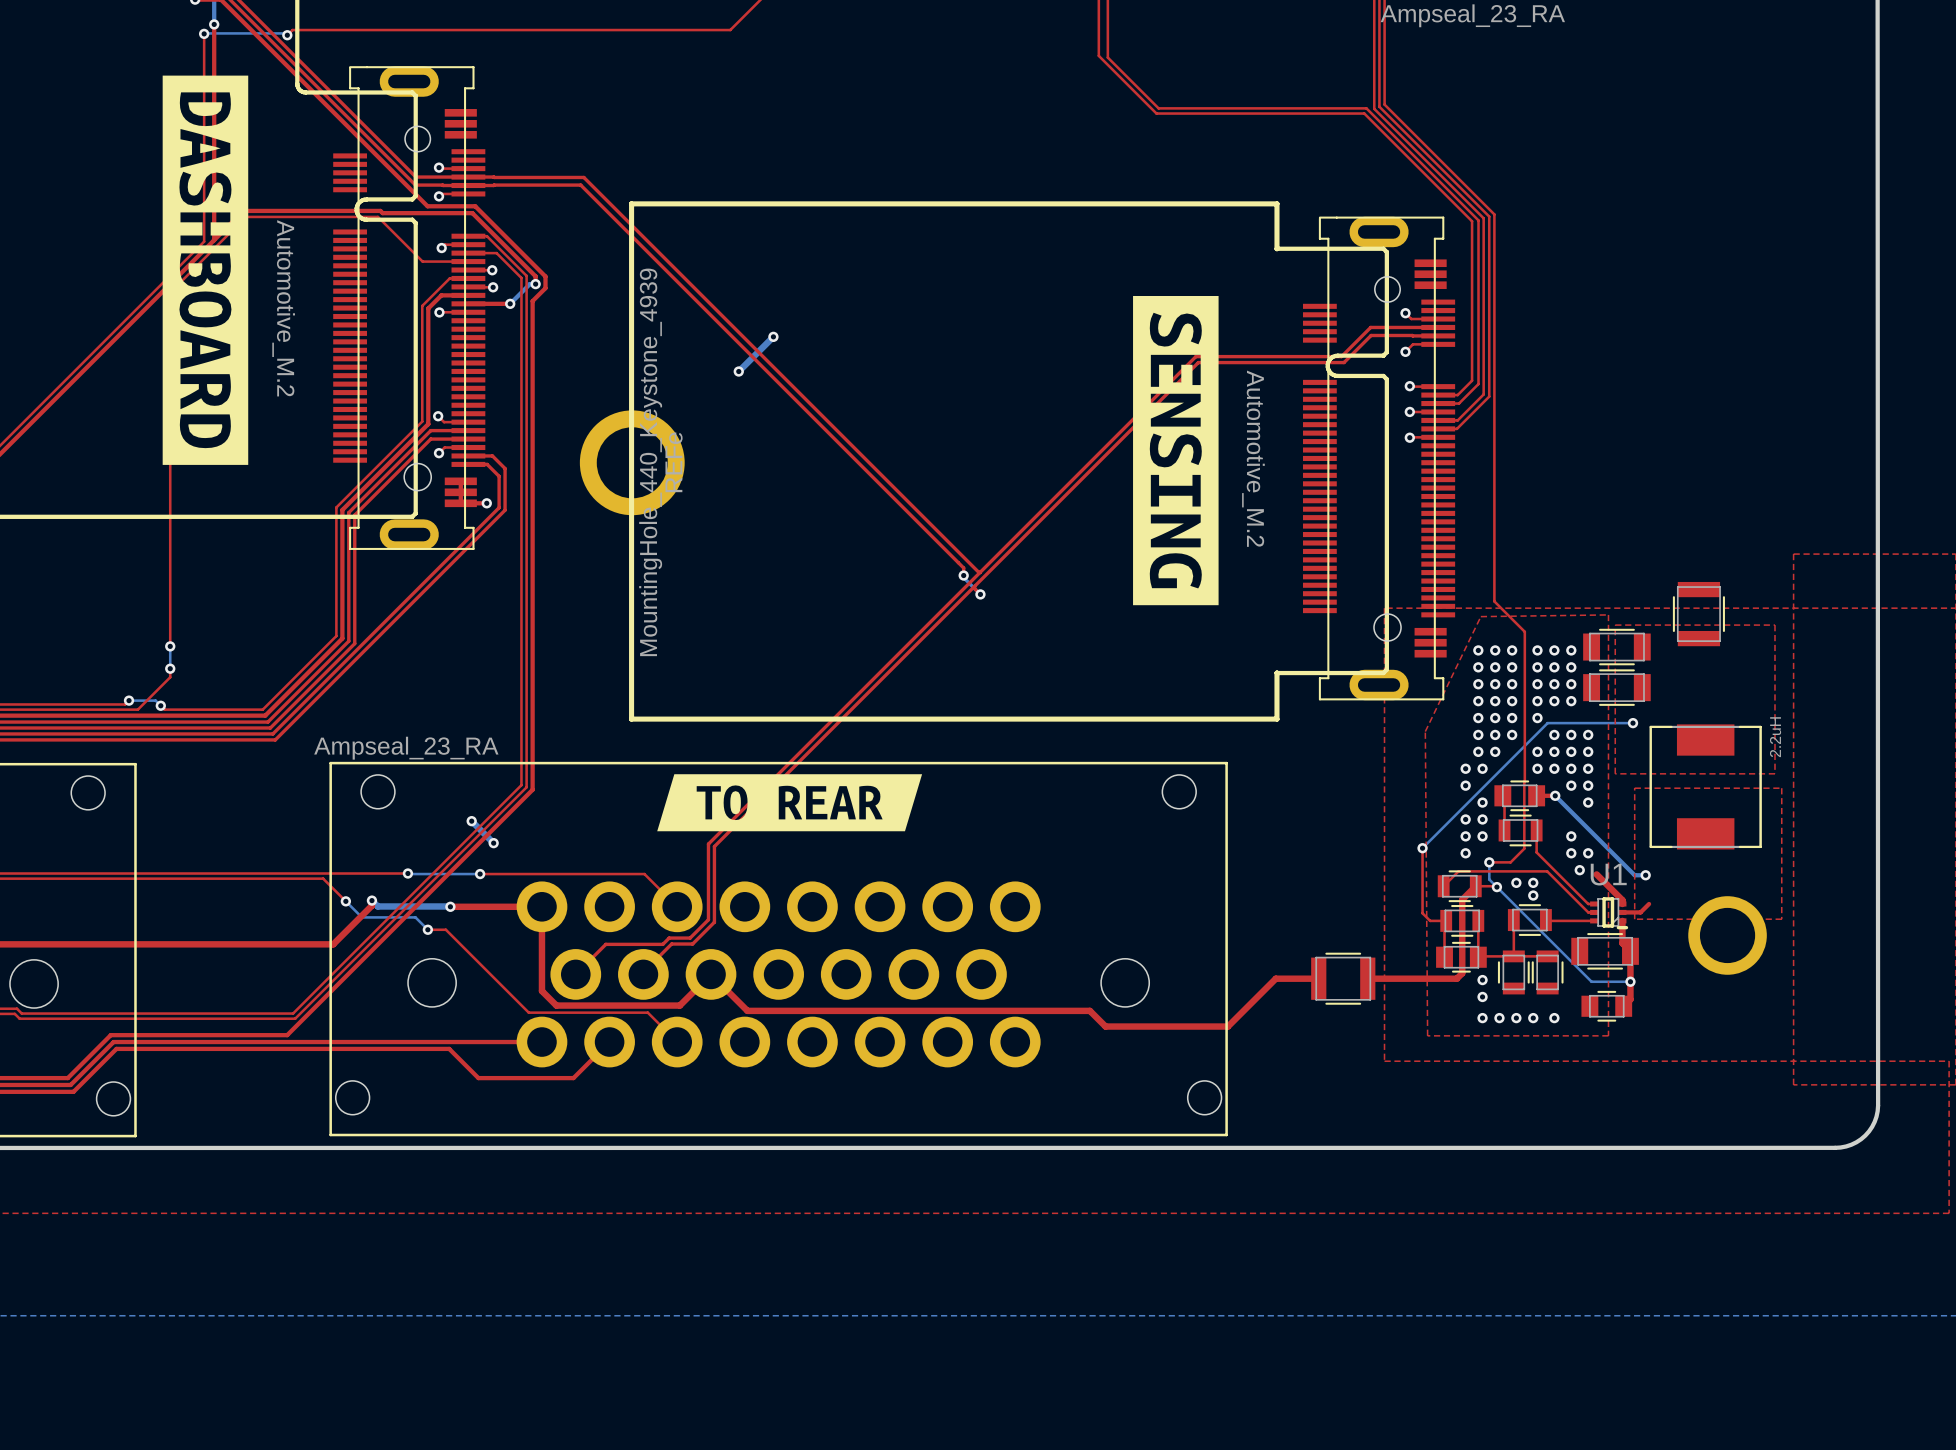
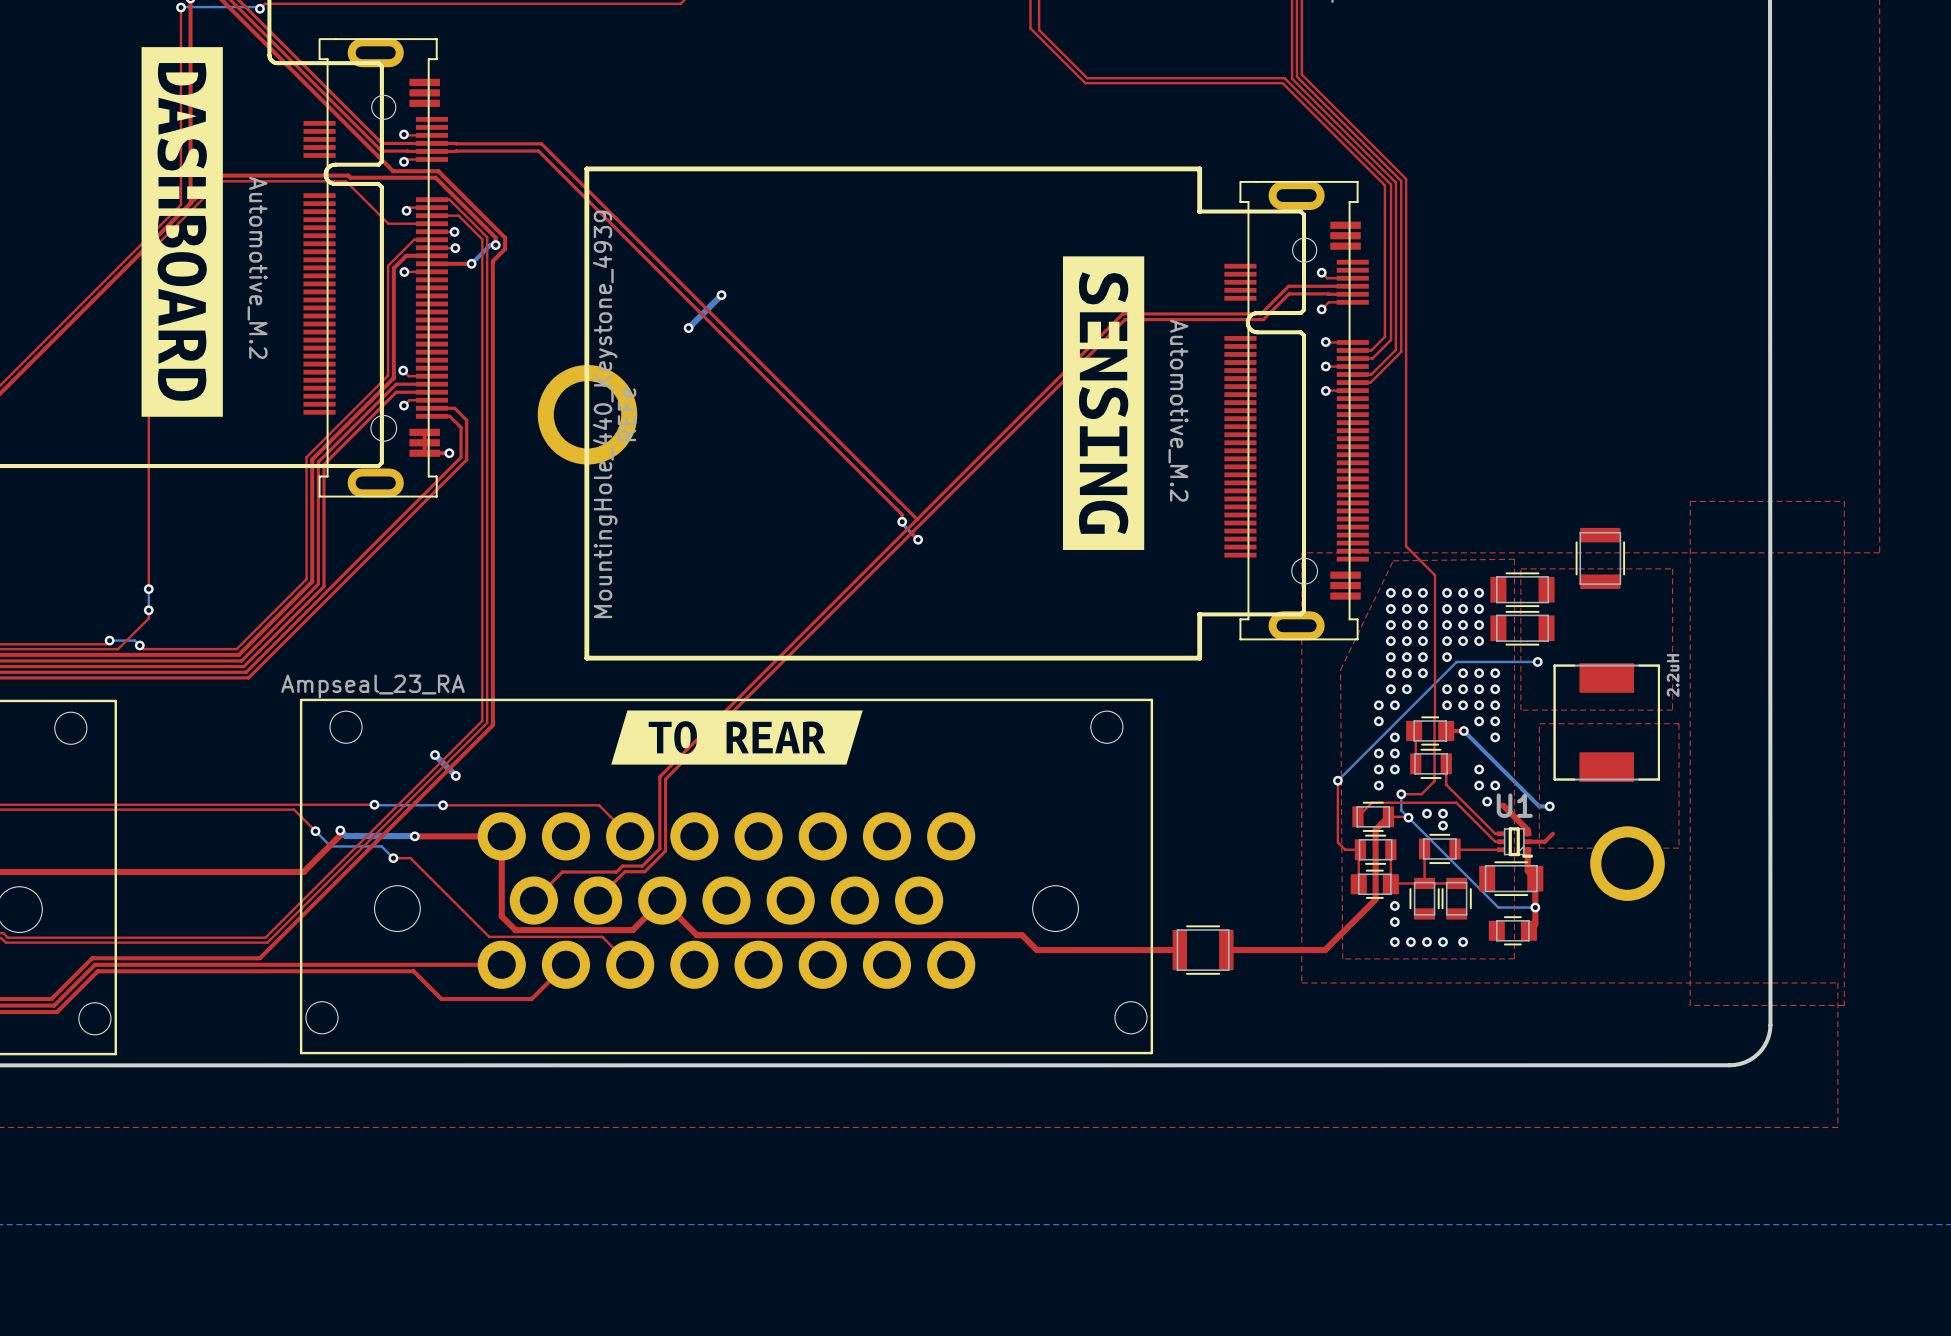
top track: (1318, 978) (1275, 978) (1227, 1026) -> (1179, 950) (1153, 950)
part position: (1343, 978) -> (1203, 950)
top track: (1367, 978) (1456, 978) -> (1226, 950) (1325, 950) (1370, 904)

